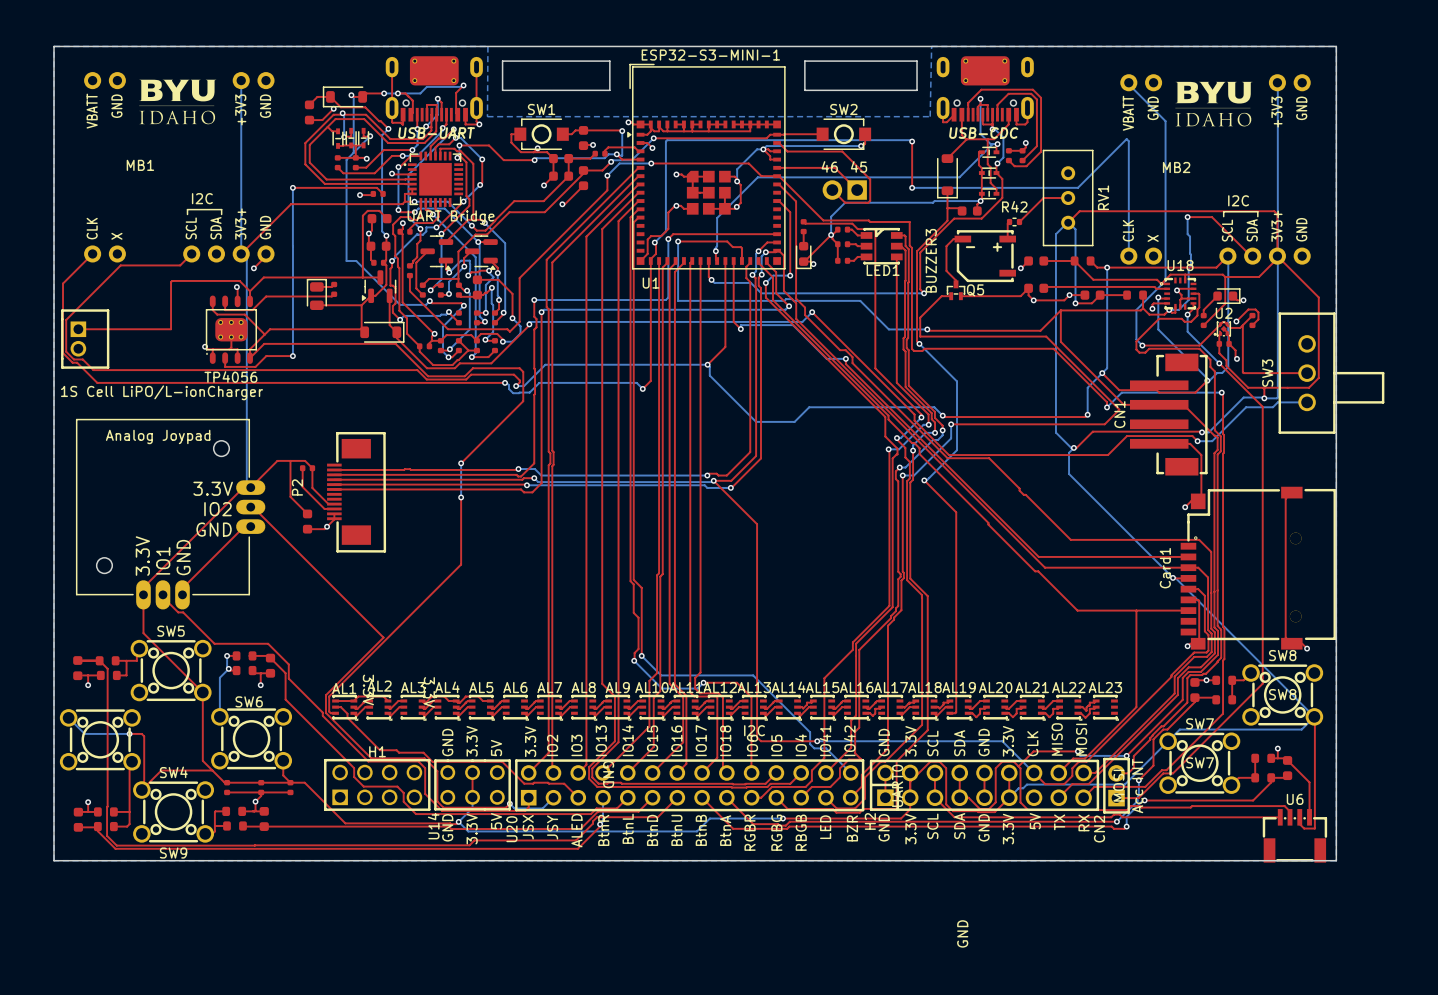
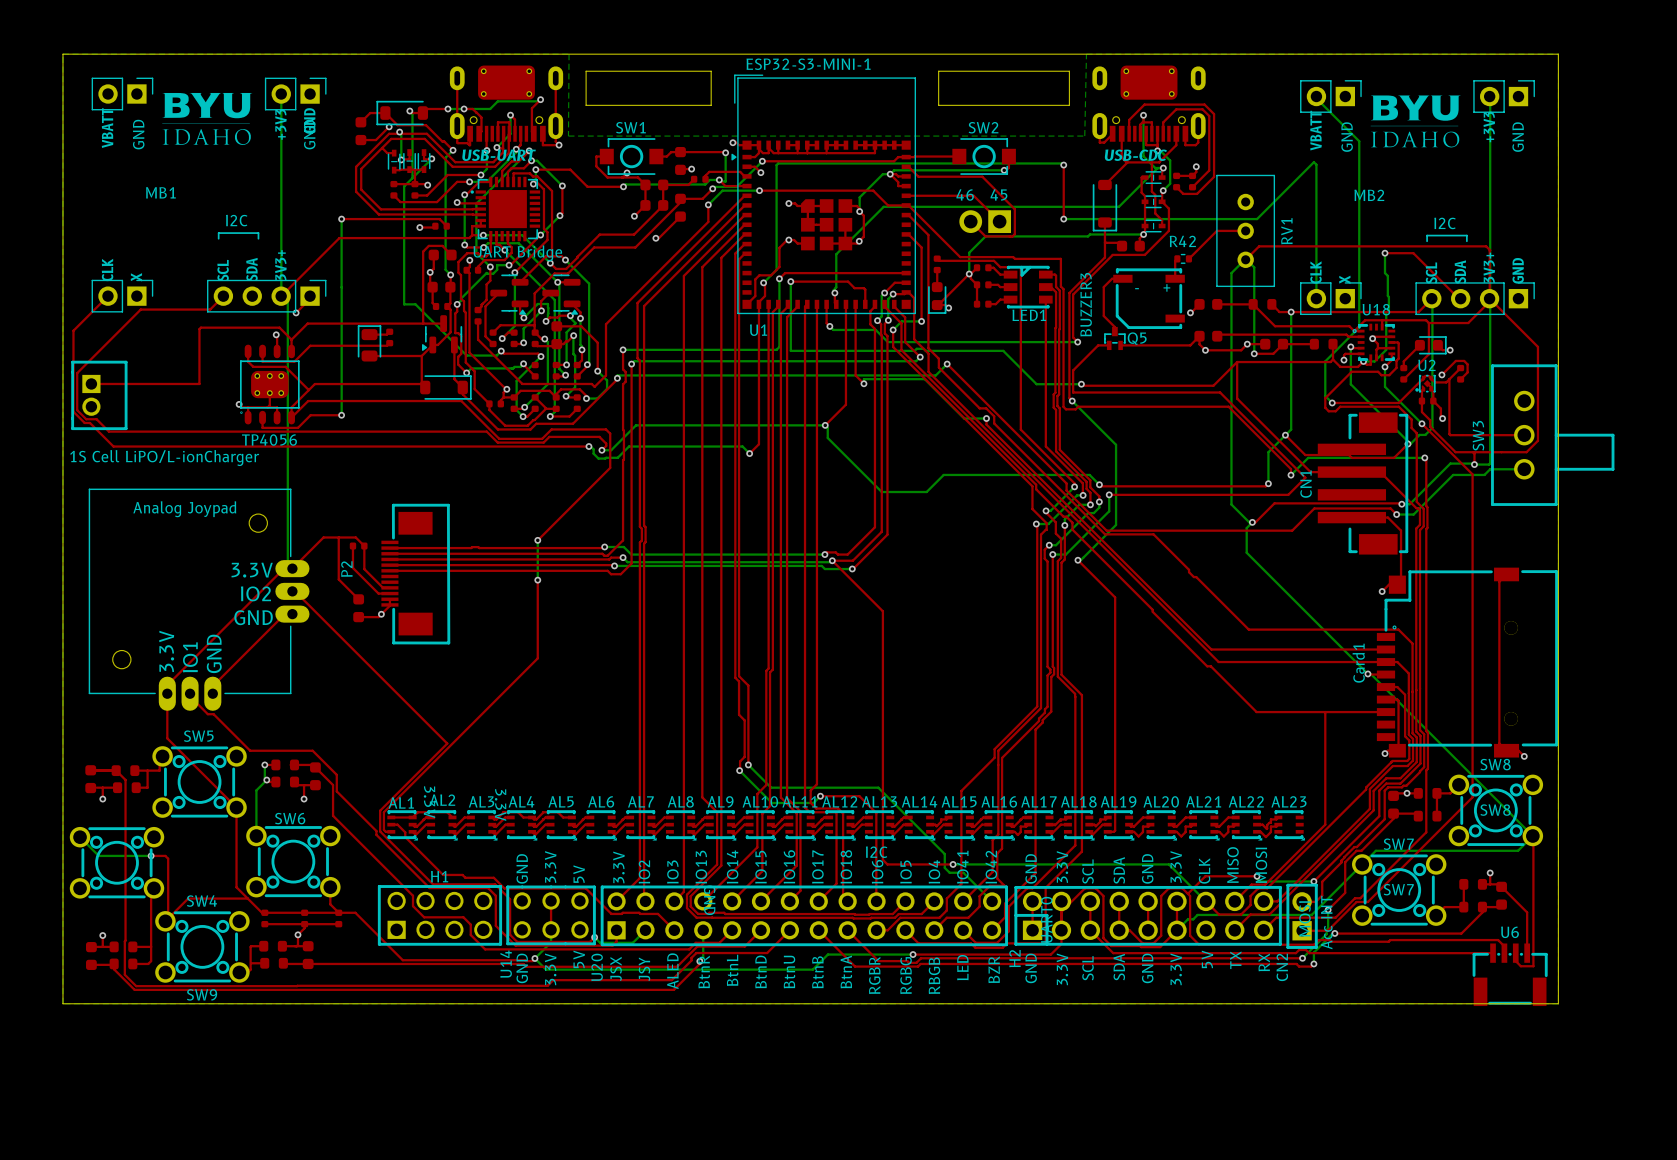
MB1 footprint: [84, 72, 275, 263] -> [91, 77, 327, 313]
MB2 footprint: [1120, 74, 1311, 265] -> [1300, 80, 1535, 316]
text: GND (962, 933) -> none

